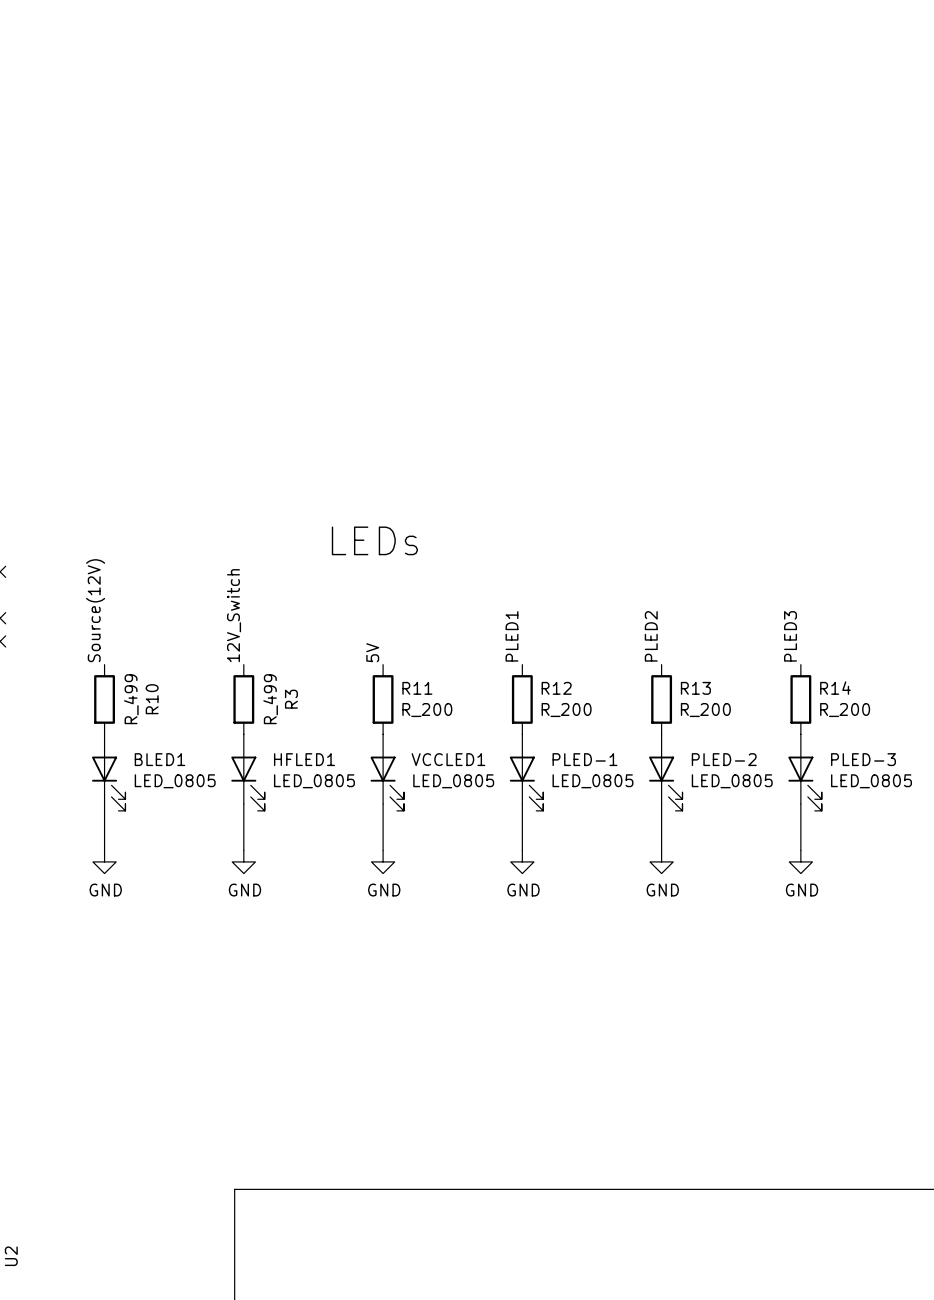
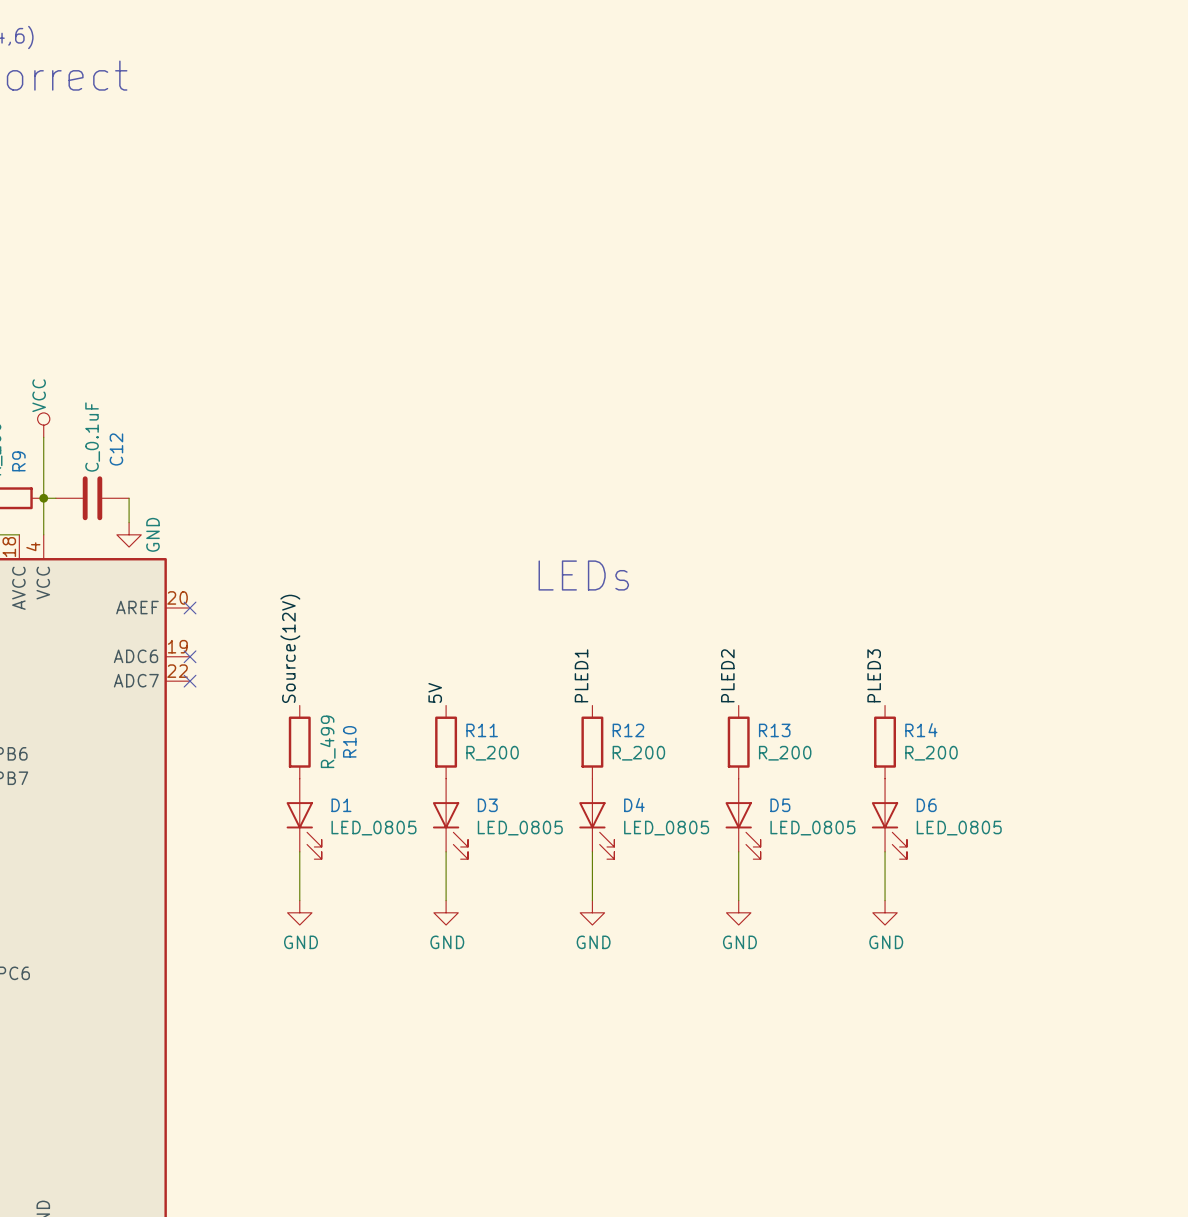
label: 12V_Switch (234, 615) -> 5V (435, 692)
label: PLED1 (511, 636) -> PLED2 (727, 675)
label: PLED2 (651, 636) -> PLED3 (874, 675)
label: PLED3 (790, 636) -> none
label: 5V (372, 652) -> PLED1 (581, 675)
R11 name: R11 (417, 688) -> R12 (628, 730)
R12 name: R12 (556, 688) -> R13 (774, 730)
R13 name: R13 (695, 688) -> R14 (921, 730)
R3 value: R_499 (270, 699) -> R_200 (492, 753)
R3 name: R3 (291, 699) -> R11 (482, 730)
R14: R_200 (800, 699) -> none
BLED1 name: BLED1 (159, 759) -> D1 (341, 805)
HFLED1 name: HFLED1 (304, 759) -> D3 (487, 805)
VCCLED1 name: VCCLED1 (448, 759) -> D4 (634, 805)
PLED-1 name: PLED-1 (584, 759) -> D5 (780, 805)
PLED-2 name: PLED-2 (724, 759) -> D6 (926, 805)
PLED-3: LED_0805 (805, 772) -> none
wire: (800, 803) (800, 850) -> none
power symbol: GND (800, 861) -> none

